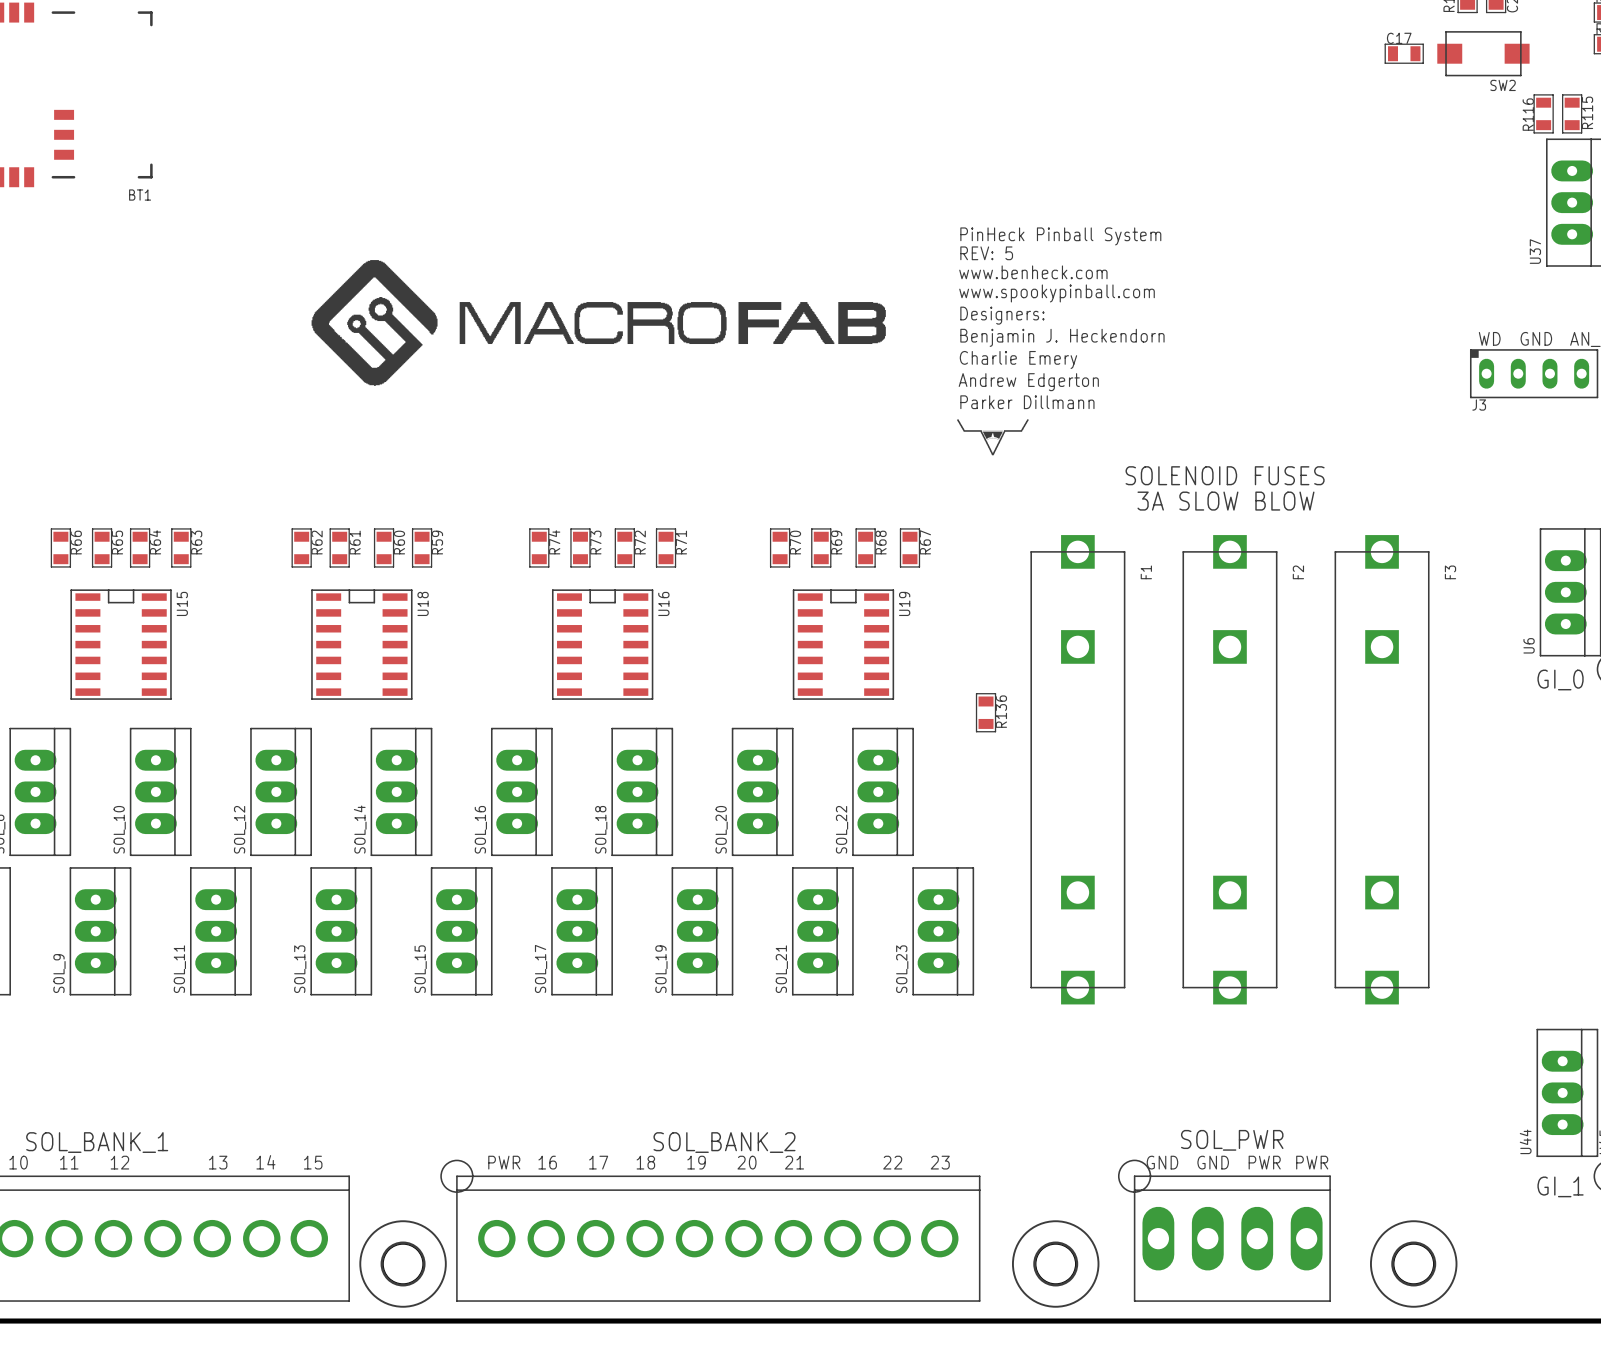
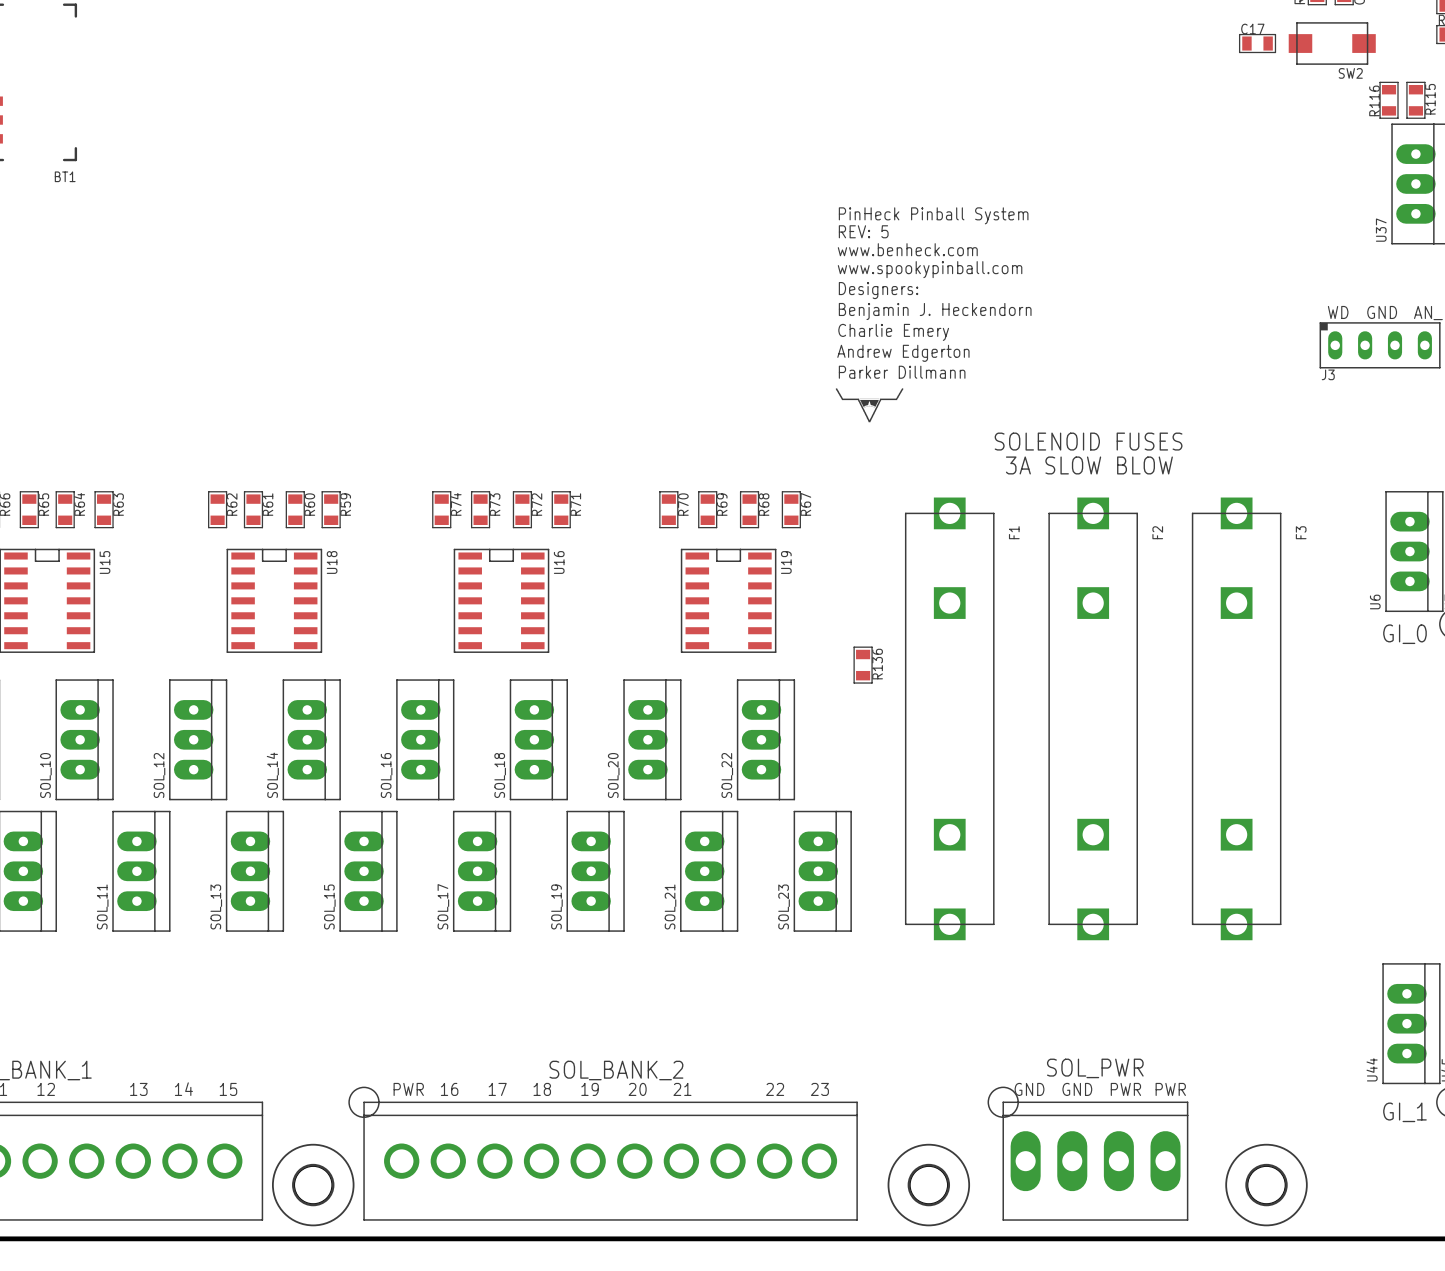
drawing: [311, 260, 886, 386] -> none

